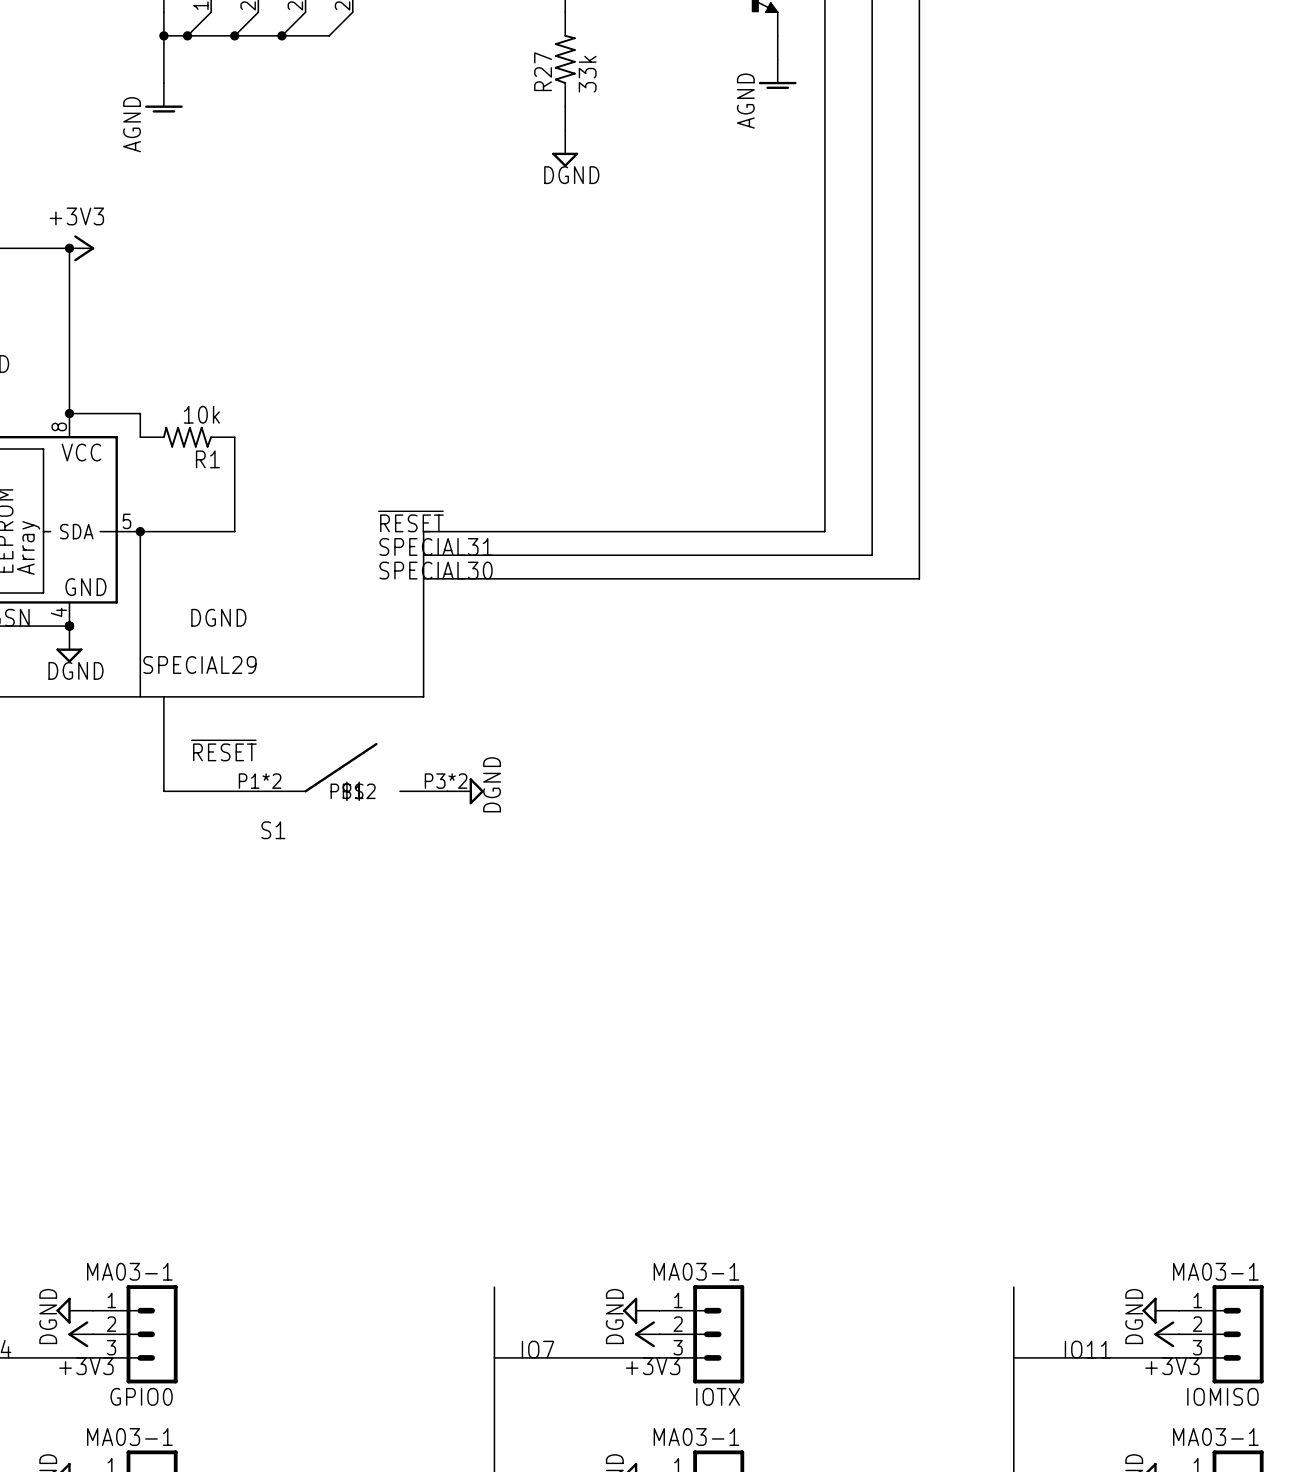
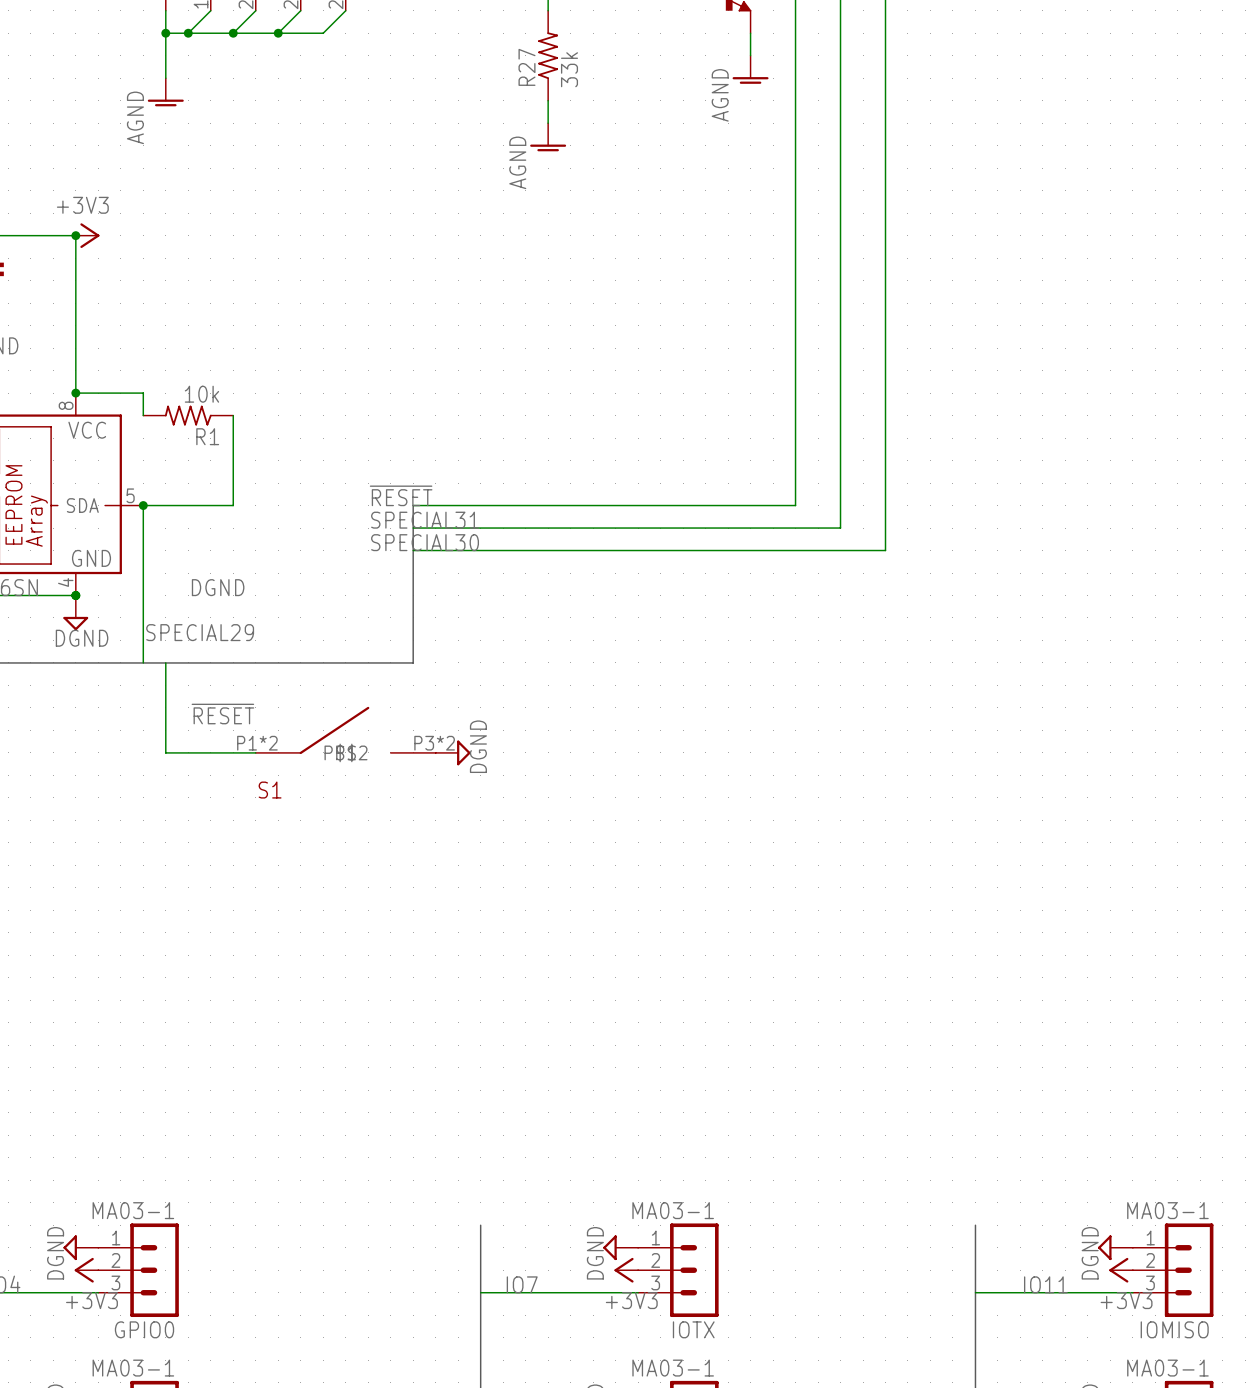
power symbol: DGND (565, 148) -> AGND (548, 137)

